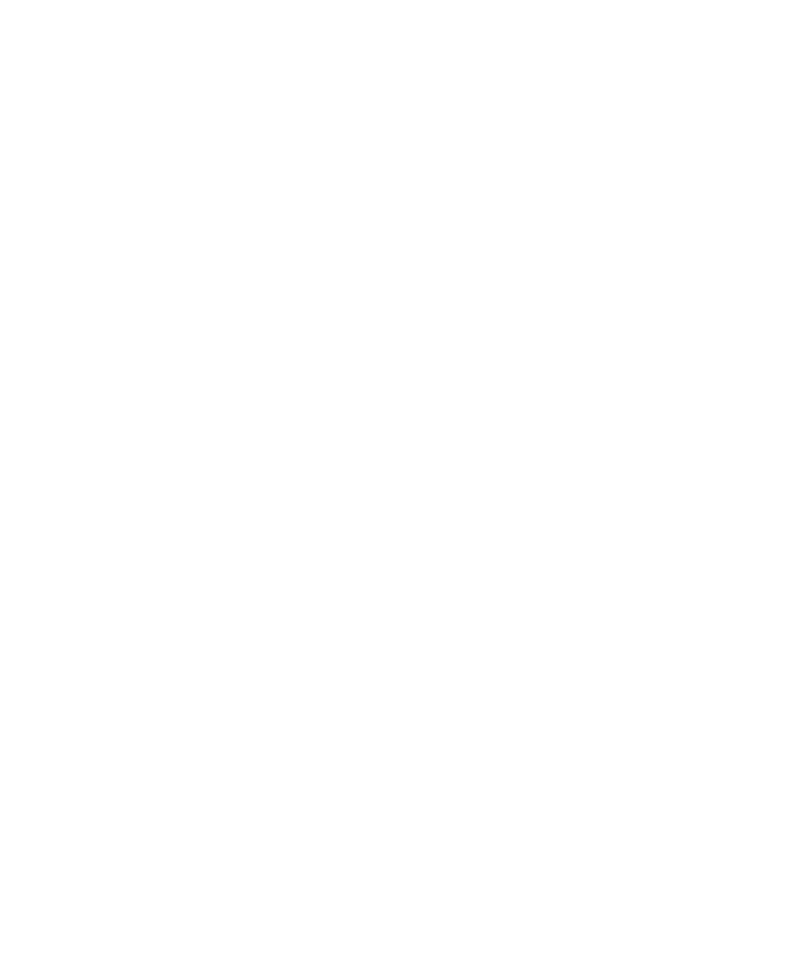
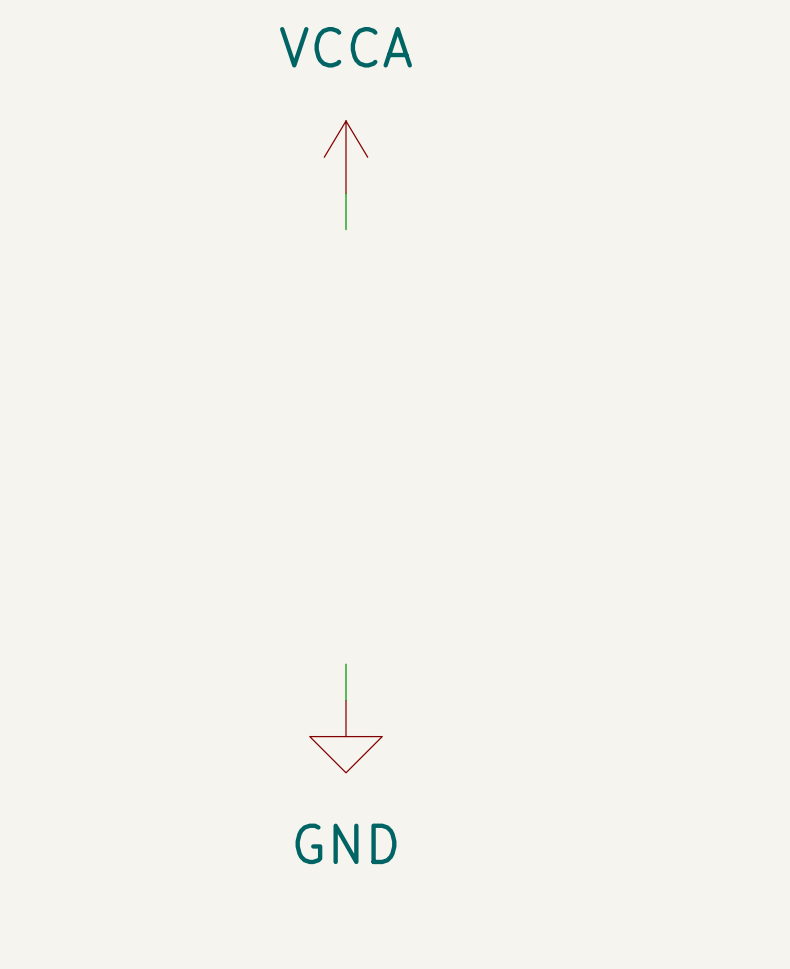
power symbol: none -> VCCA (346, 157)
wire: none -> (346, 193) (346, 229)
wire: none -> (346, 664) (346, 700)
power symbol: none -> GND (346, 736)

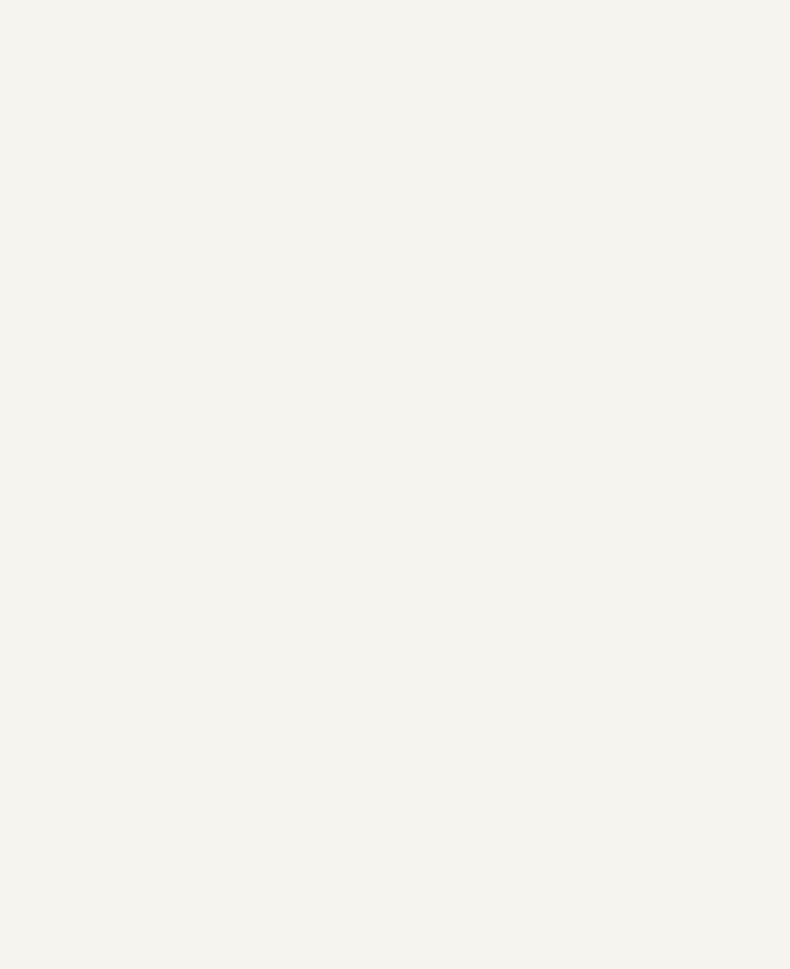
power symbol: VCCA (346, 157) -> none
wire: (346, 193) (346, 229) -> none
wire: (346, 664) (346, 700) -> none
power symbol: GND (346, 736) -> none

